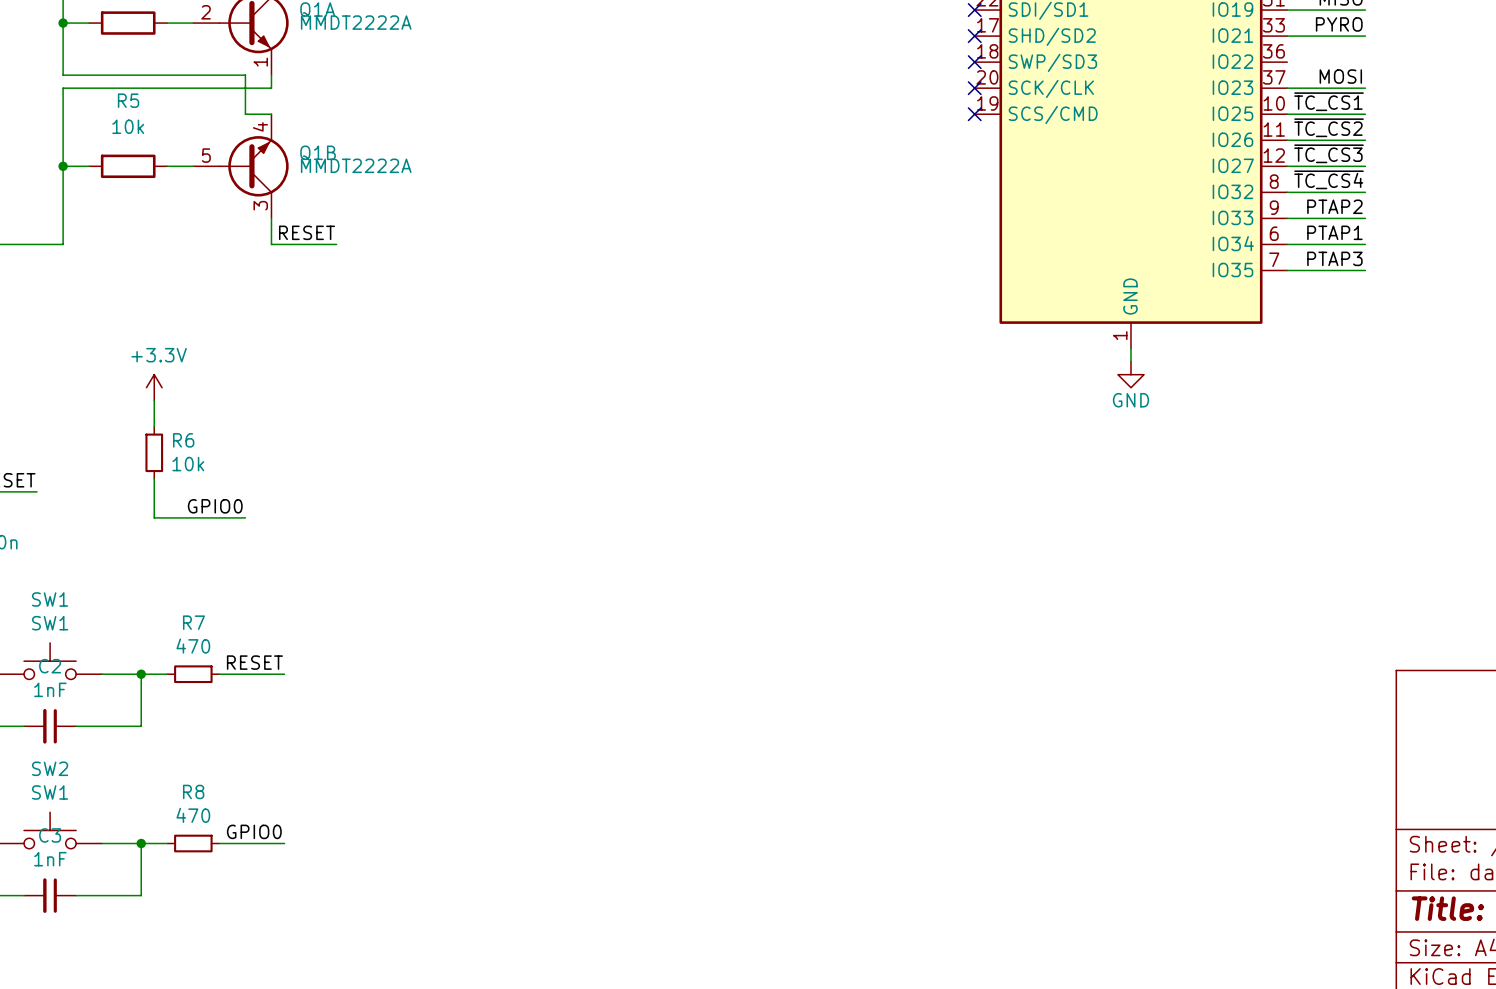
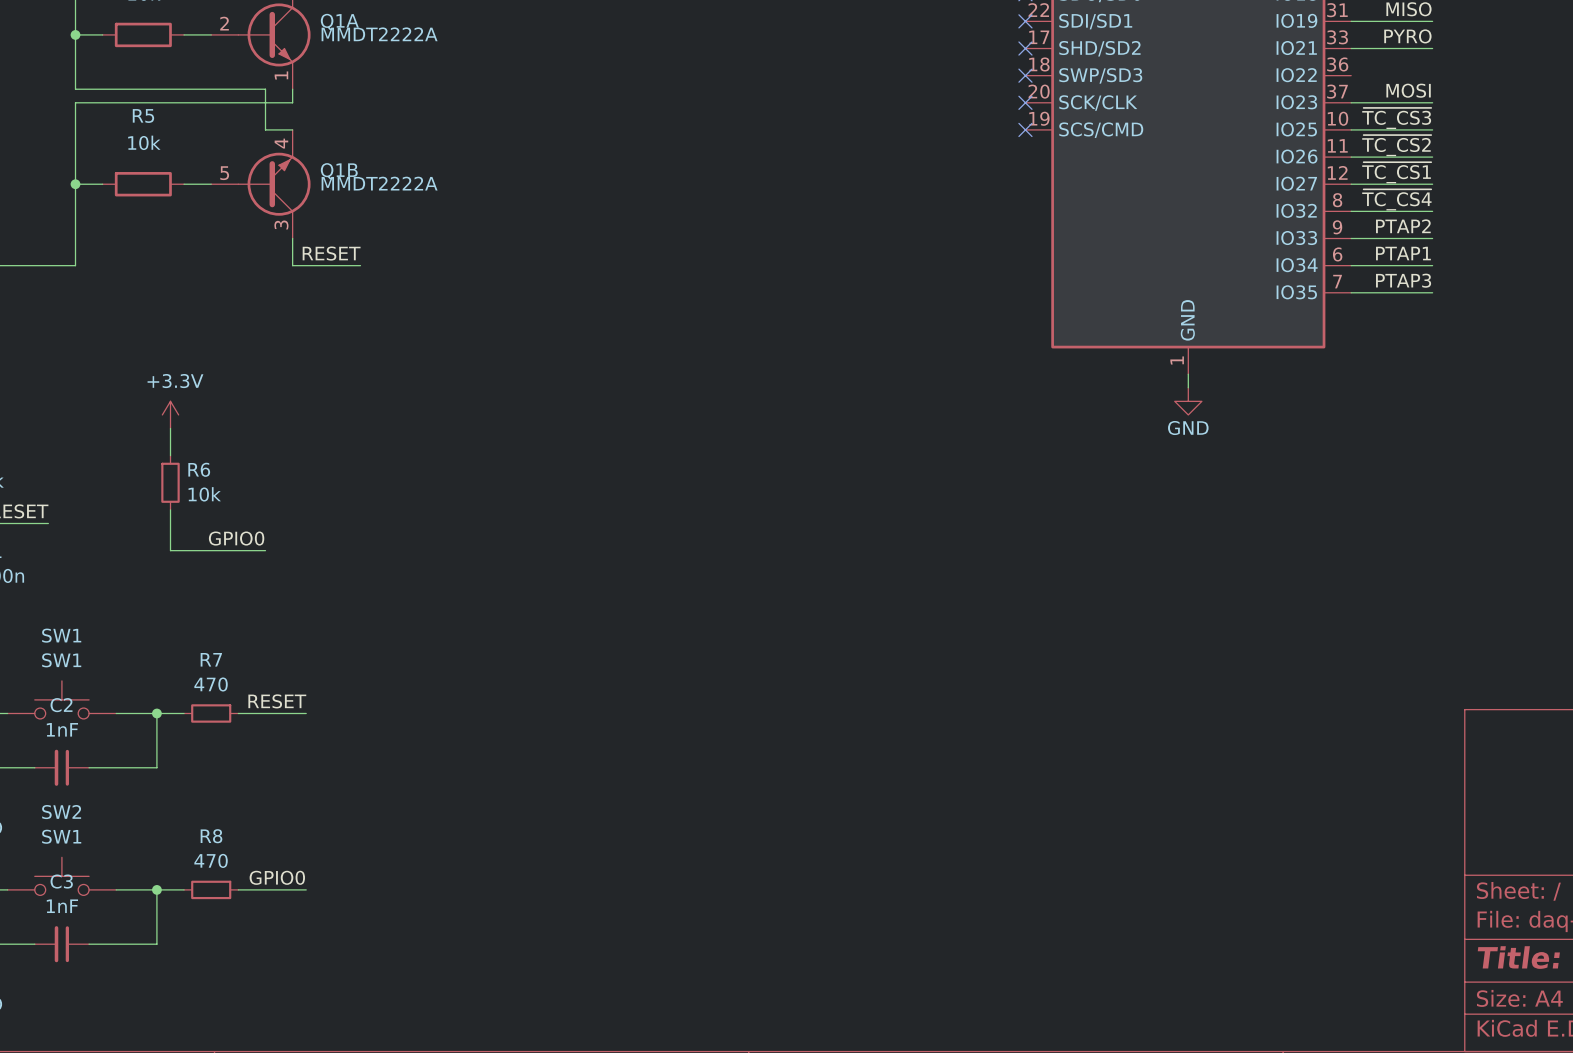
label: ~{TC_CS1} (1329, 101) -> ~{TC_CS3} (1396, 118)
label: ~{TC_CS3} (1329, 153) -> ~{TC_CS1} (1396, 172)

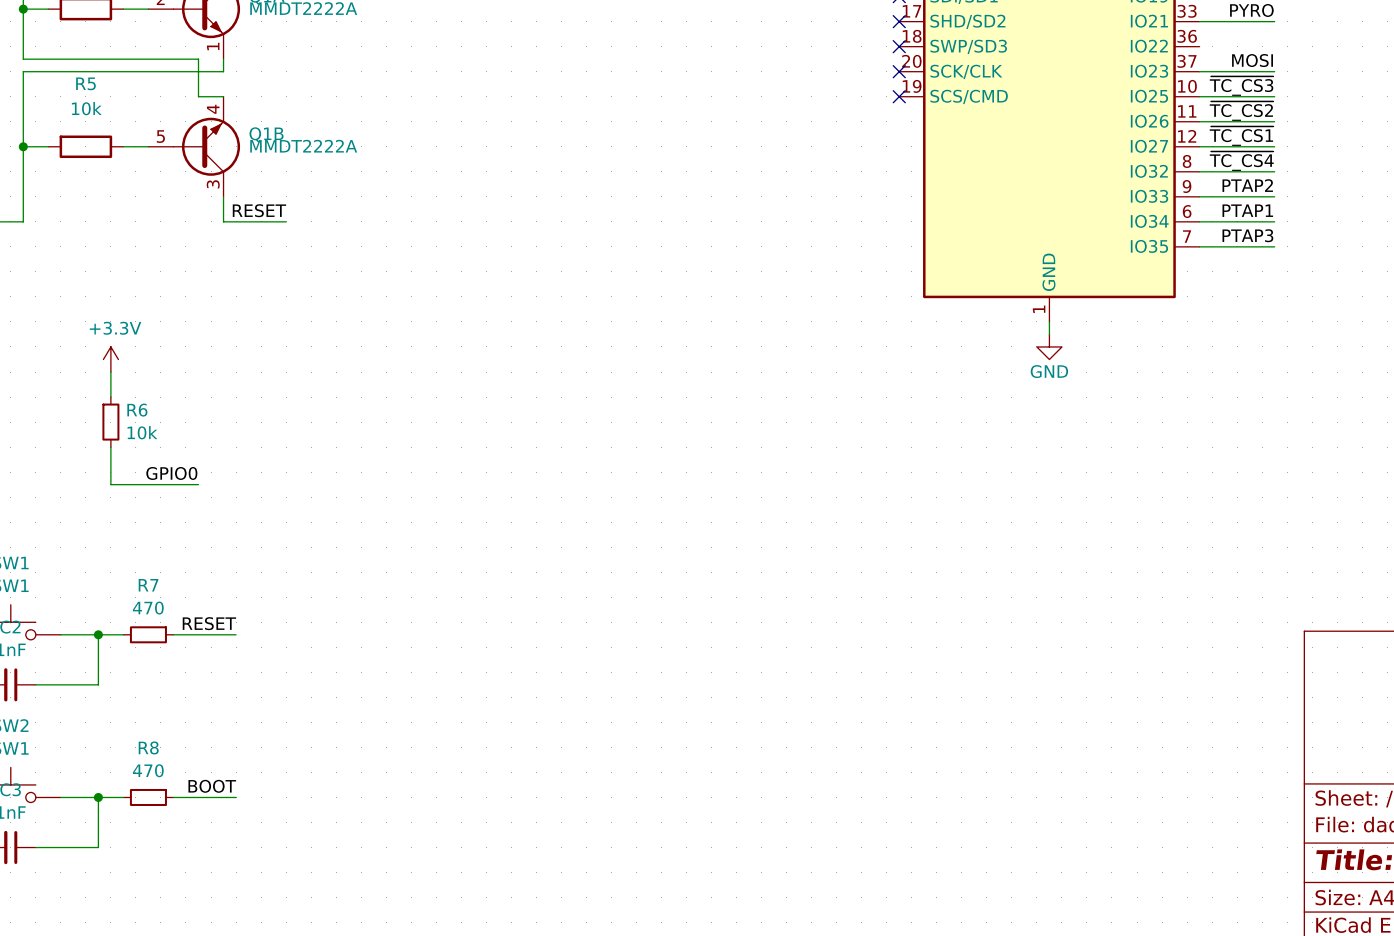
label: GPIO0 (277, 877) -> BOOT (212, 786)

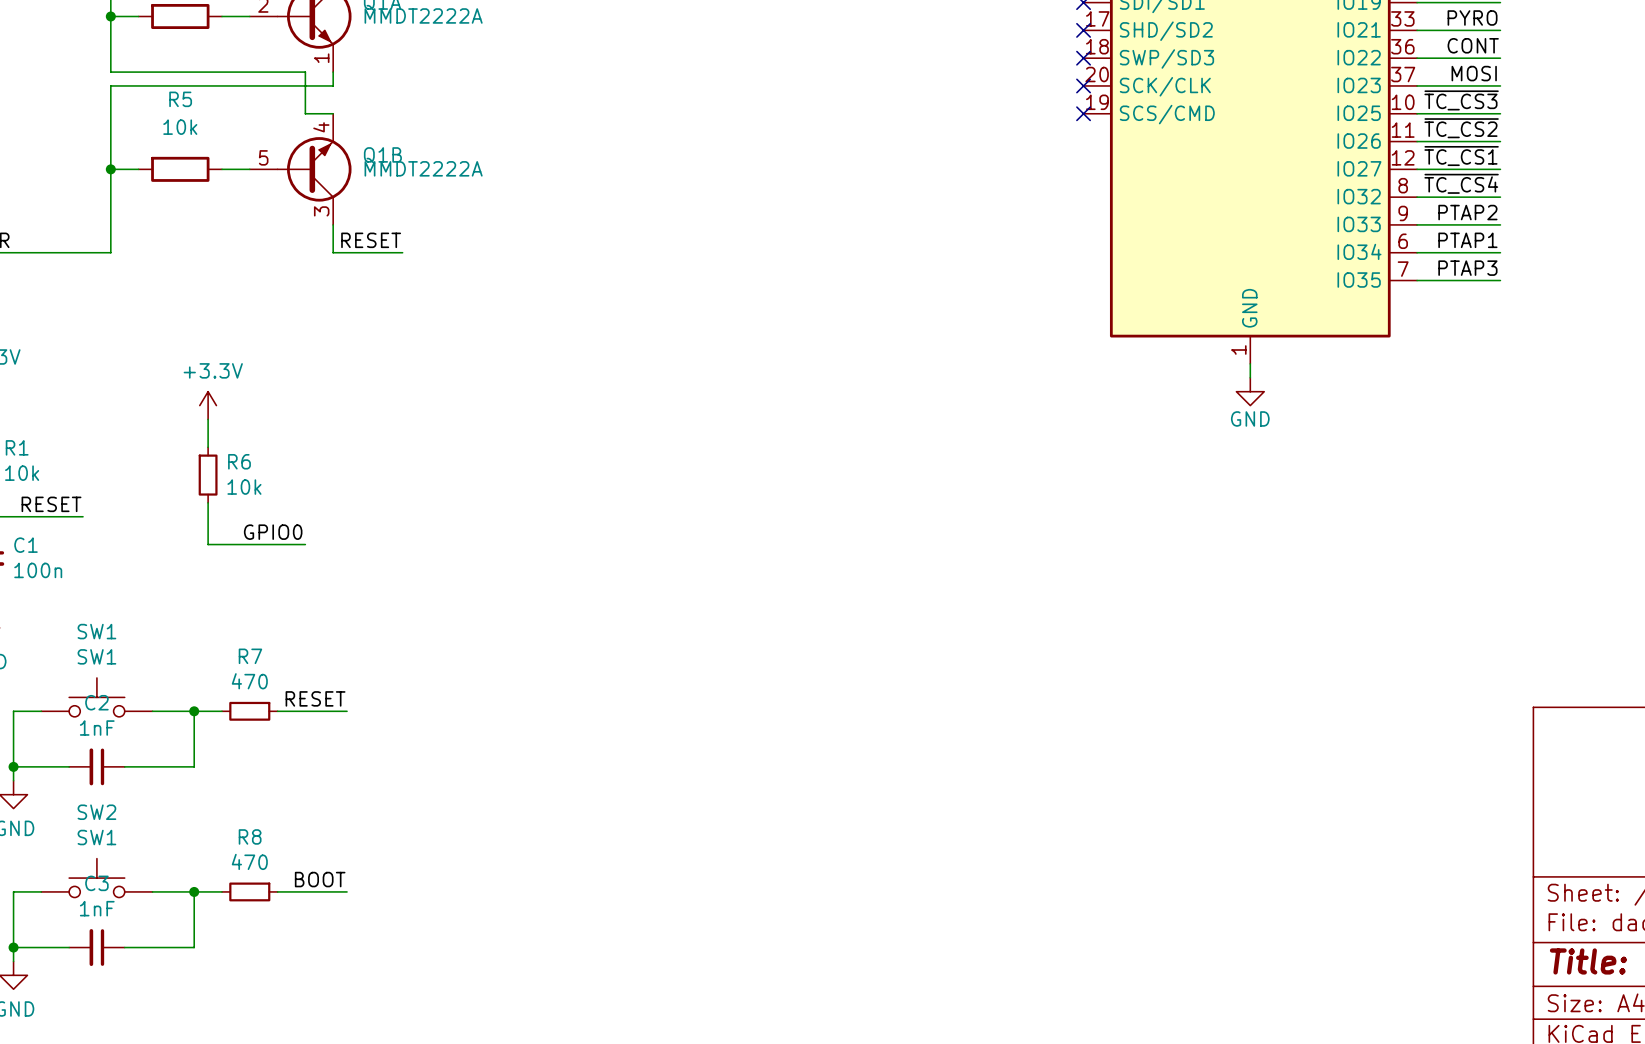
label: none -> CONT (1473, 45)
wire: none -> (1417, 58) (1500, 58)

